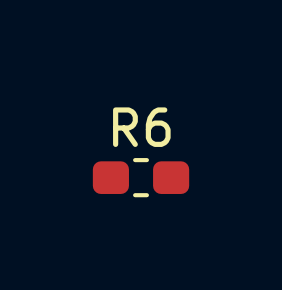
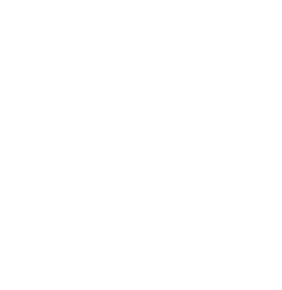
R6: (141, 177) -> none

